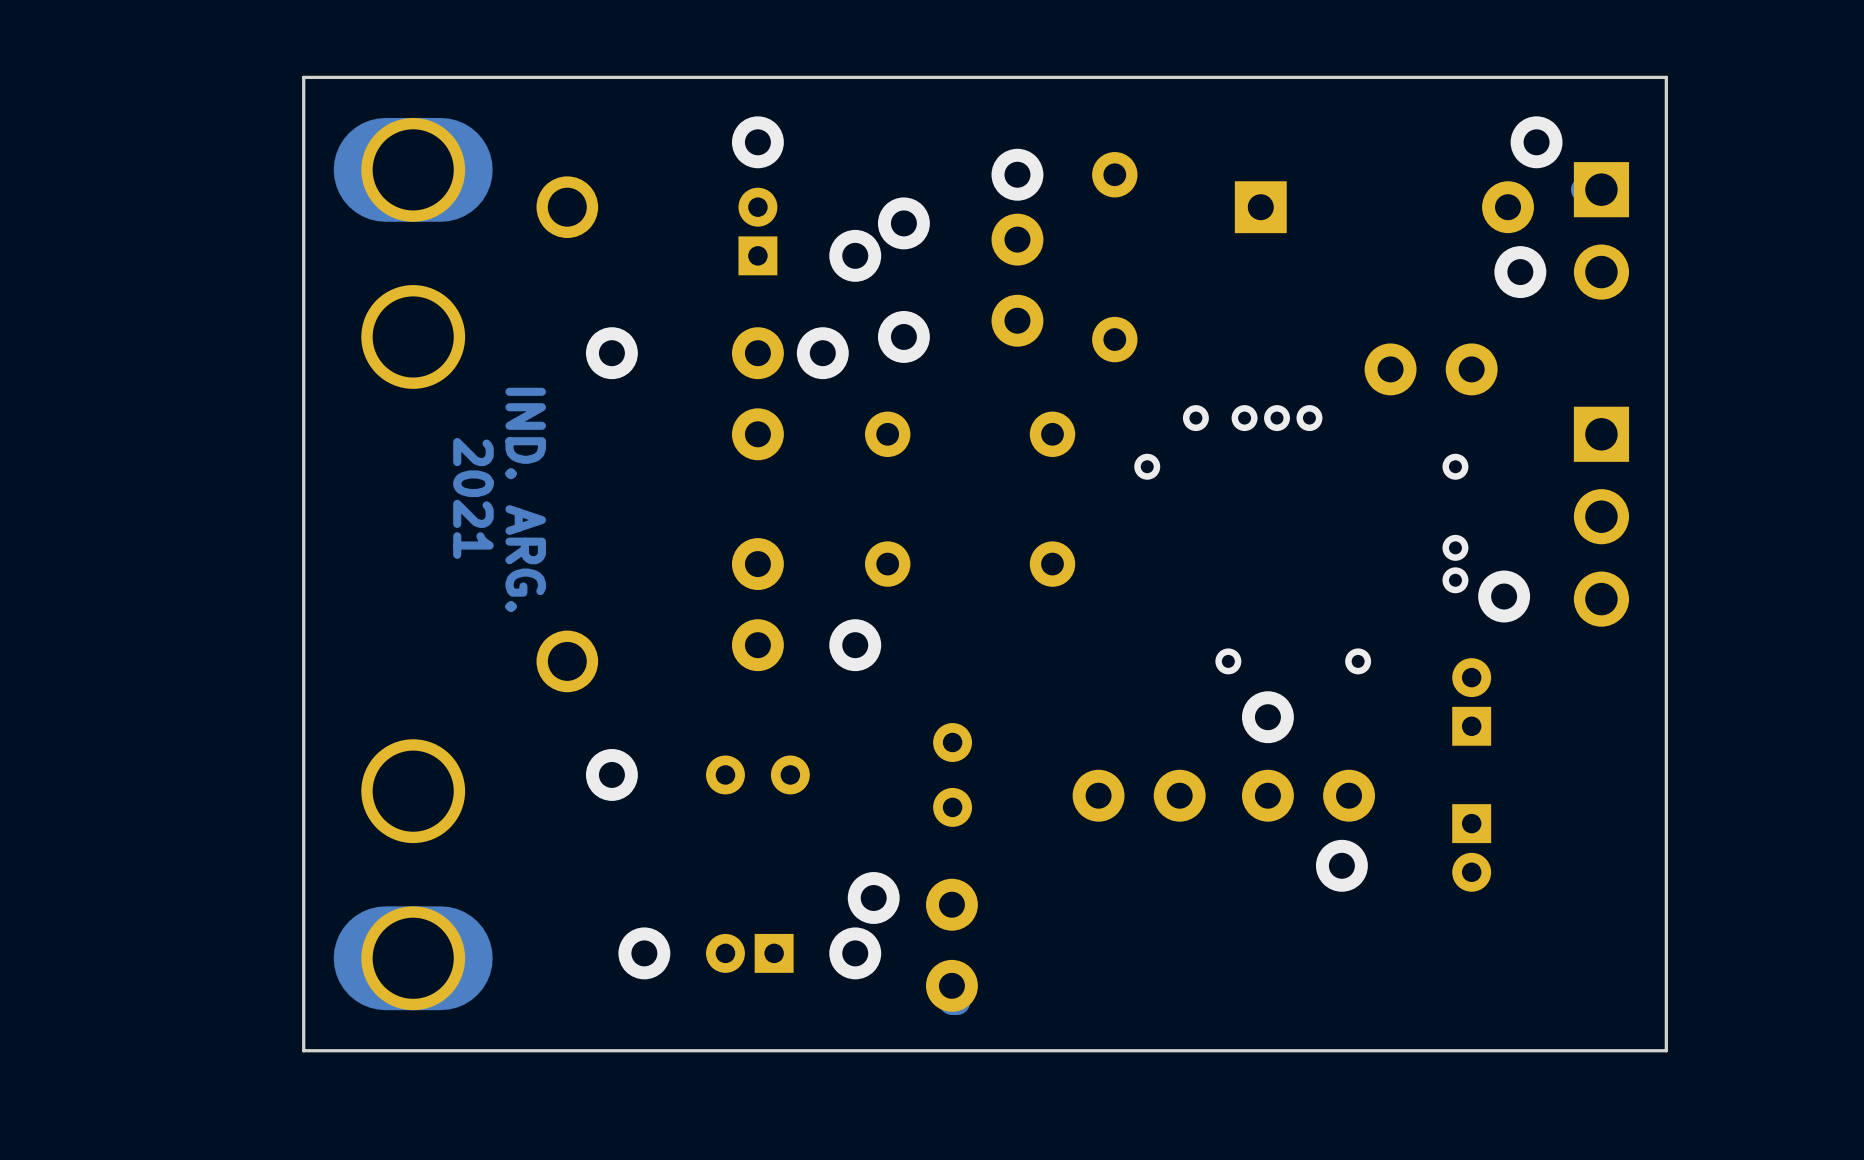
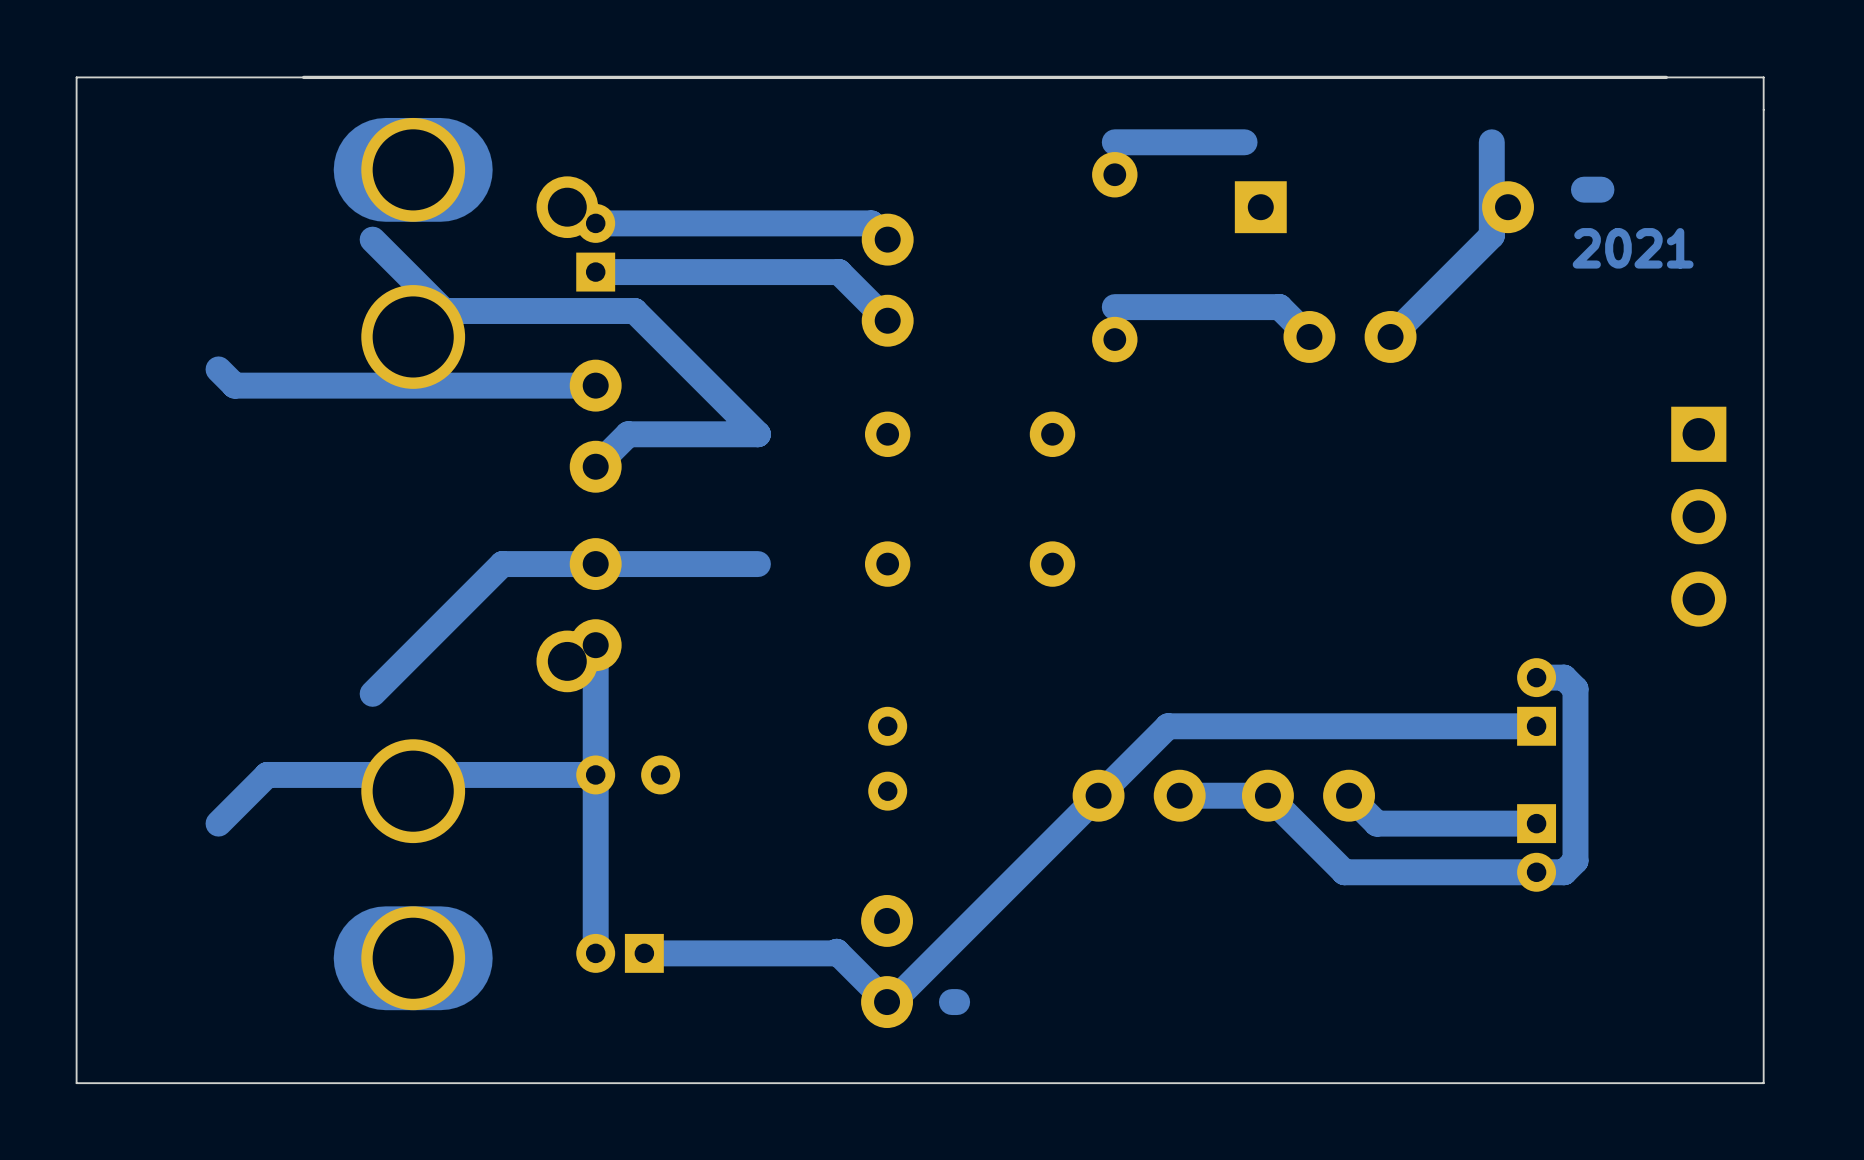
board edge: (1666, 77) (1666, 1050) (303, 1050) (303, 77) -> (1666, 77) (1763, 77) (1763, 1083) (76, 1083) (76, 77) (303, 77)
via: (757, 142) -> none
track: none -> (1244, 142) (1114, 142)
track: none -> (1491, 142) (1491, 235) (1390, 336)
via: (1536, 142) -> none
via: (1017, 174) -> none
track: none -> (595, 223) (871, 223) (887, 239)
via: (903, 223) -> none
part: (1601, 230) -> none
part position: (757, 231) -> (595, 247)
track: none -> (372, 239) (444, 311) (634, 311) (757, 434) (628, 434) (595, 466)
text: none -> 2021 (1633, 248)
via: (855, 255) -> none
track: none -> (595, 272) (839, 272) (887, 320)
via: (1520, 272) -> none
part: none -> (887, 280)
part: (1017, 280) -> none
track: none -> (1114, 307) (1279, 307) (1309, 336)
via: (903, 336) -> none
via: (611, 353) -> none
via: (822, 353) -> none
track: none -> (218, 369) (234, 385) (595, 385)
part position: (1431, 369) -> (1350, 336)
part: (757, 393) -> none
via: (1195, 418) -> none
via: (1244, 418) -> none
via: (1277, 418) -> none
via: (1309, 418) -> none
part: none -> (595, 426)
via: (1147, 466) -> none
via: (1455, 466) -> none
text: 2021 (473, 498) -> none
text: IND. ARG. (525, 499) -> none
part position: (1601, 516) -> (1698, 516)
via: (1455, 547) -> none
track: none -> (757, 564) (502, 564) (372, 693)
via: (1455, 580) -> none
via: (1504, 596) -> none
part: none -> (595, 604)
part: (757, 604) -> none
track: none -> (595, 645) (595, 953)
via: (855, 645) -> none
via: (1228, 661) -> none
via: (1358, 661) -> none
track: none -> (1536, 677) (1564, 677) (1575, 689) (1575, 860) (1564, 872) (1344, 872) (1267, 795) (1179, 795)
part position: (1471, 701) -> (1536, 701)
via: (1267, 717) -> none
track: none -> (1536, 726) (1168, 726) (892, 1002) (887, 1002) (836, 951) (835, 953) (644, 953)
part: none -> (887, 758)
track: none -> (595, 774) (267, 774) (218, 823)
via: (611, 774) -> none
part: none -> (628, 774)
part: (757, 774) -> none
part: (952, 774) -> none
track: none -> (1349, 795) (1376, 823) (1536, 823)
part position: (1471, 847) -> (1536, 847)
via: (1341, 865) -> none
via: (873, 897) -> none
part position: (951, 945) -> (887, 961)
via: (644, 953) -> none
part position: (749, 953) -> (620, 953)
via: (855, 953) -> none

